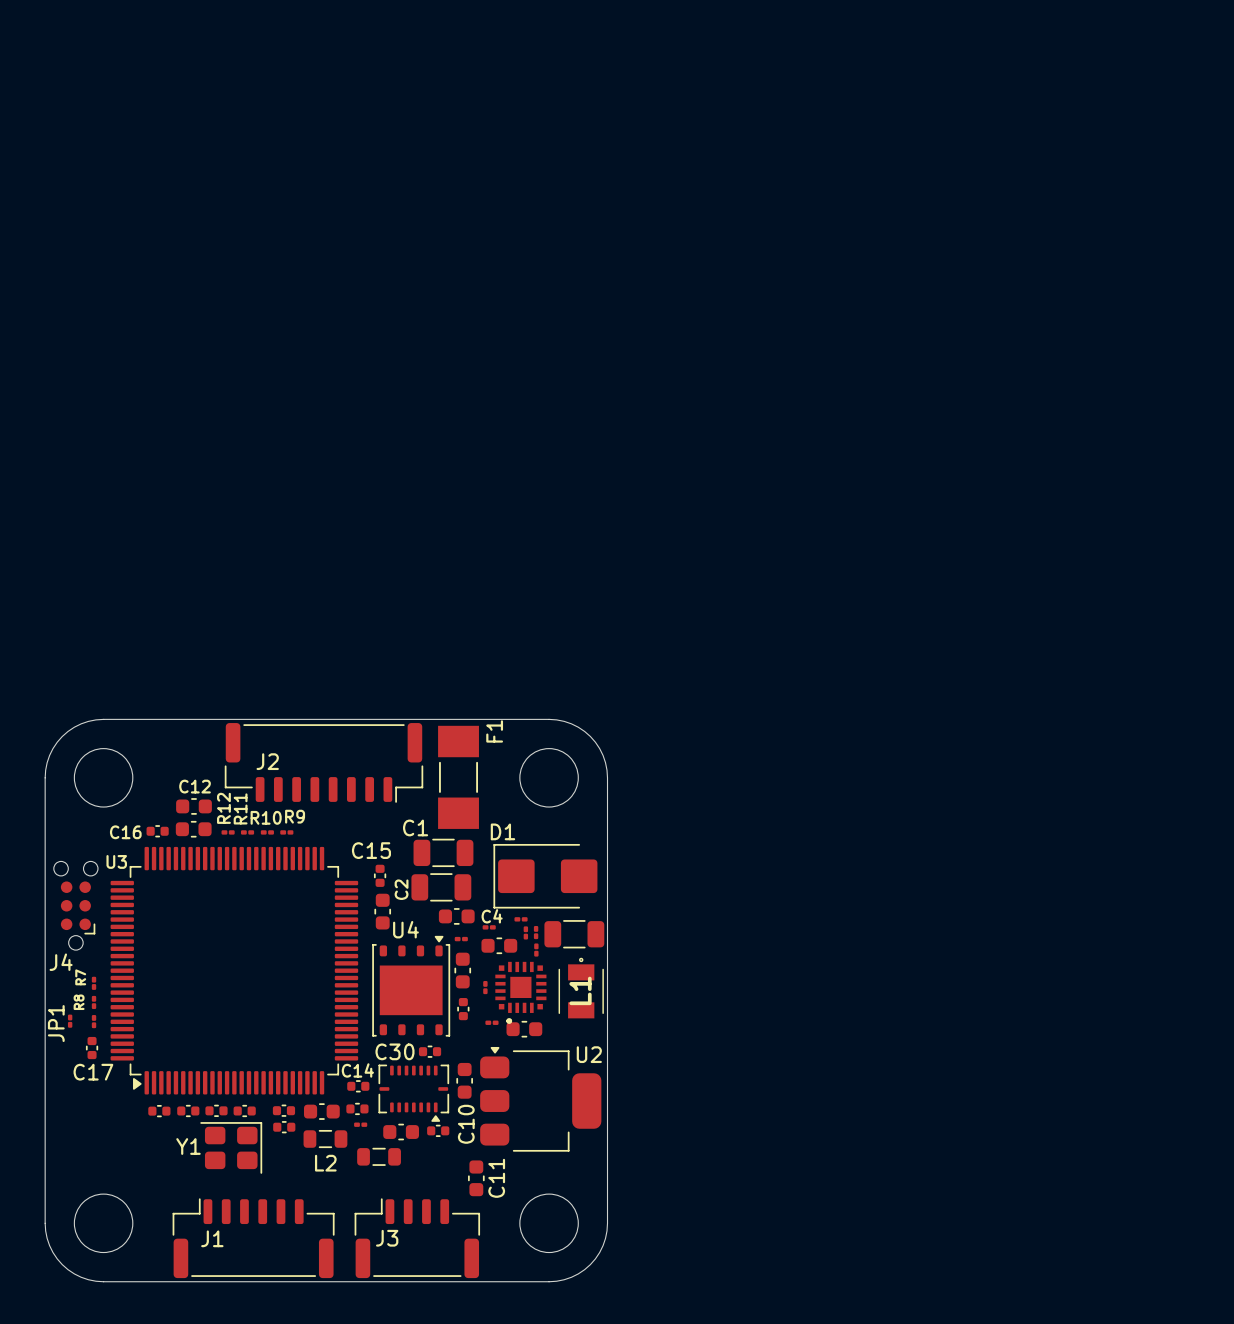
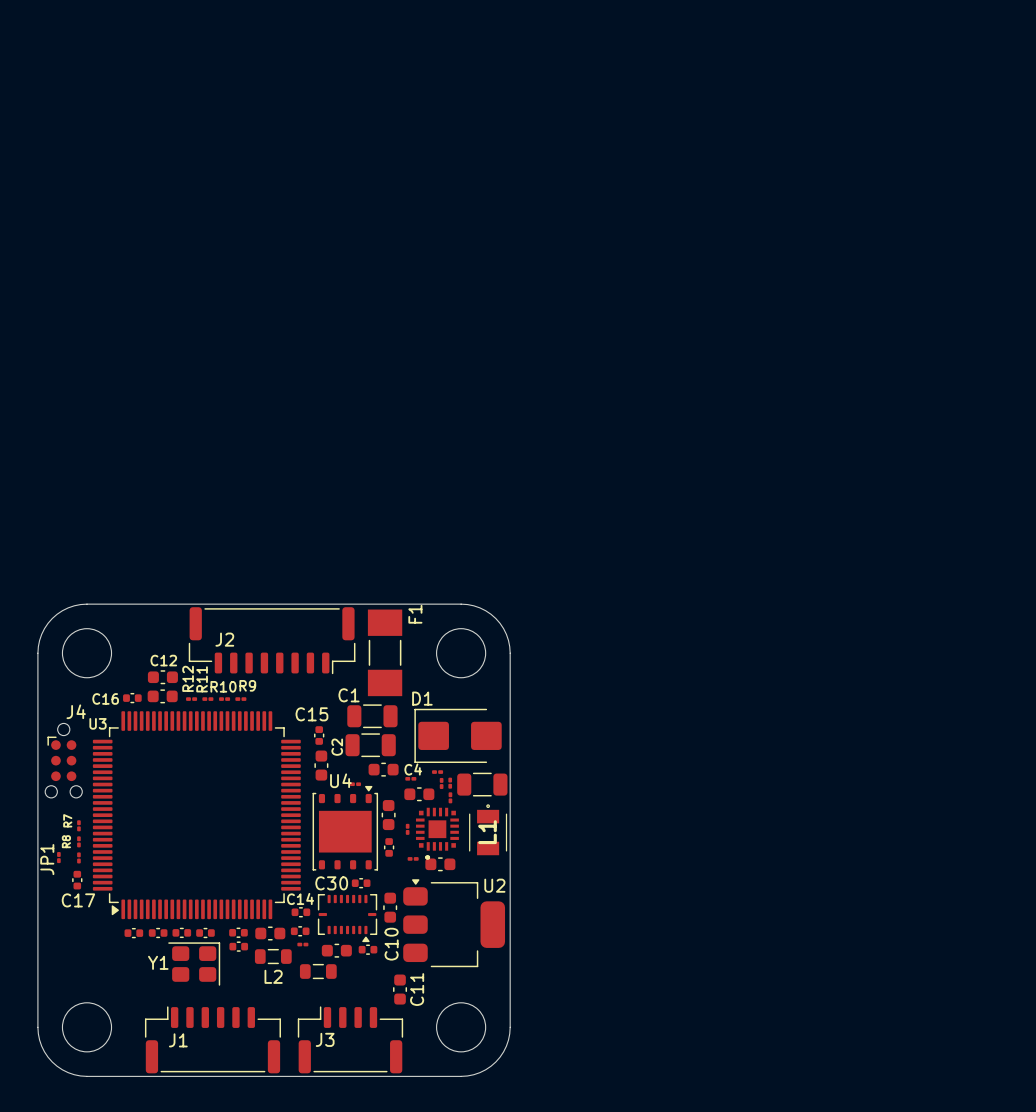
J4 rotation: 0° (75, 905) -> 180° (63, 760)
part position: (461, 939) -> (355, 784)

